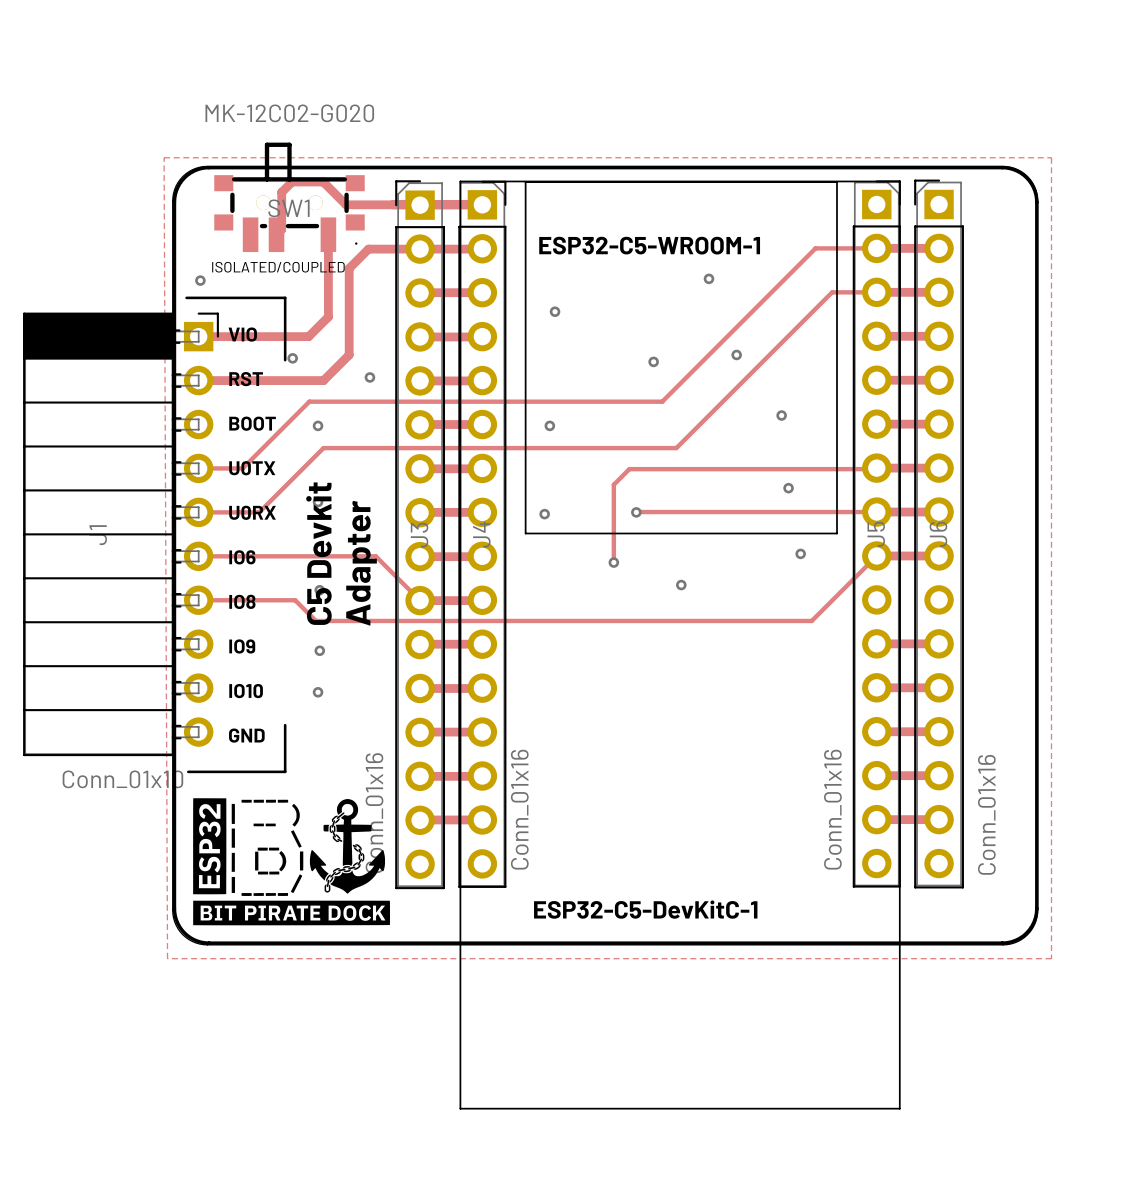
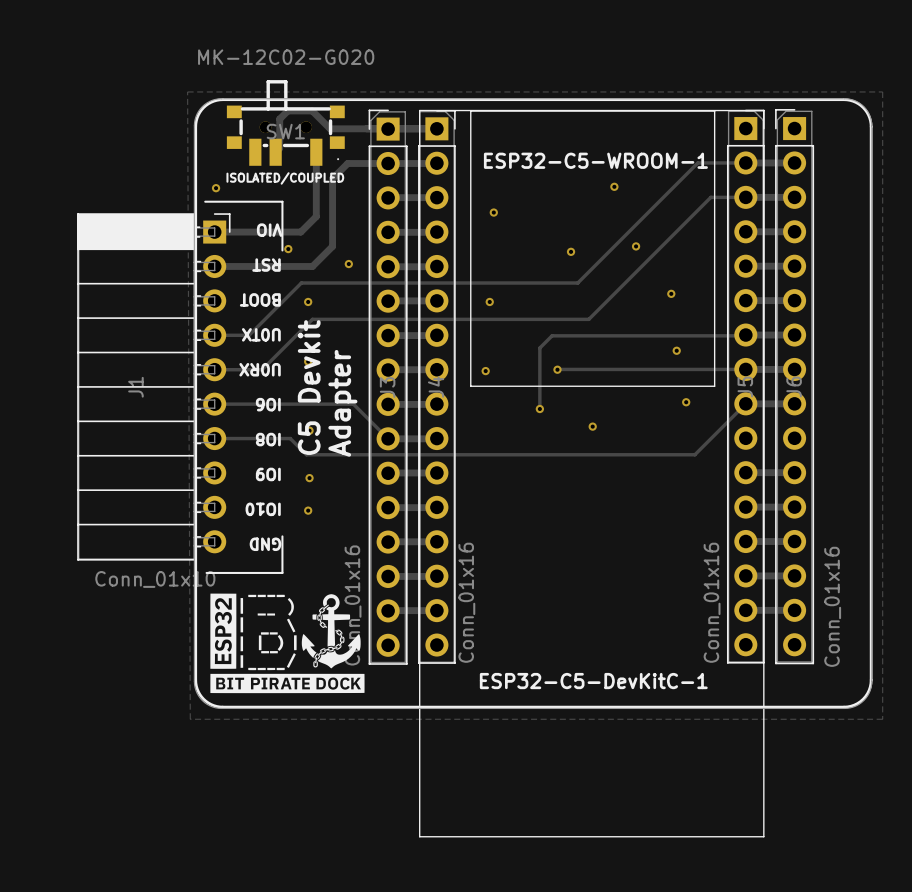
text rotation: 0° (242, 334) -> 180° (269, 230)
text rotation: 0° (246, 379) -> 180° (266, 265)
text rotation: 0° (252, 423) -> 180° (260, 299)
text rotation: 0° (252, 468) -> 180° (261, 334)
text rotation: 0° (252, 512) -> 180° (260, 369)
text rotation: 0° (242, 557) -> 180° (268, 404)
text rotation: 0° (242, 601) -> 180° (268, 439)
text rotation: 0° (242, 646) -> 180° (268, 474)
text rotation: 0° (246, 691) -> 180° (263, 509)
text rotation: 0° (246, 735) -> 180° (265, 544)

